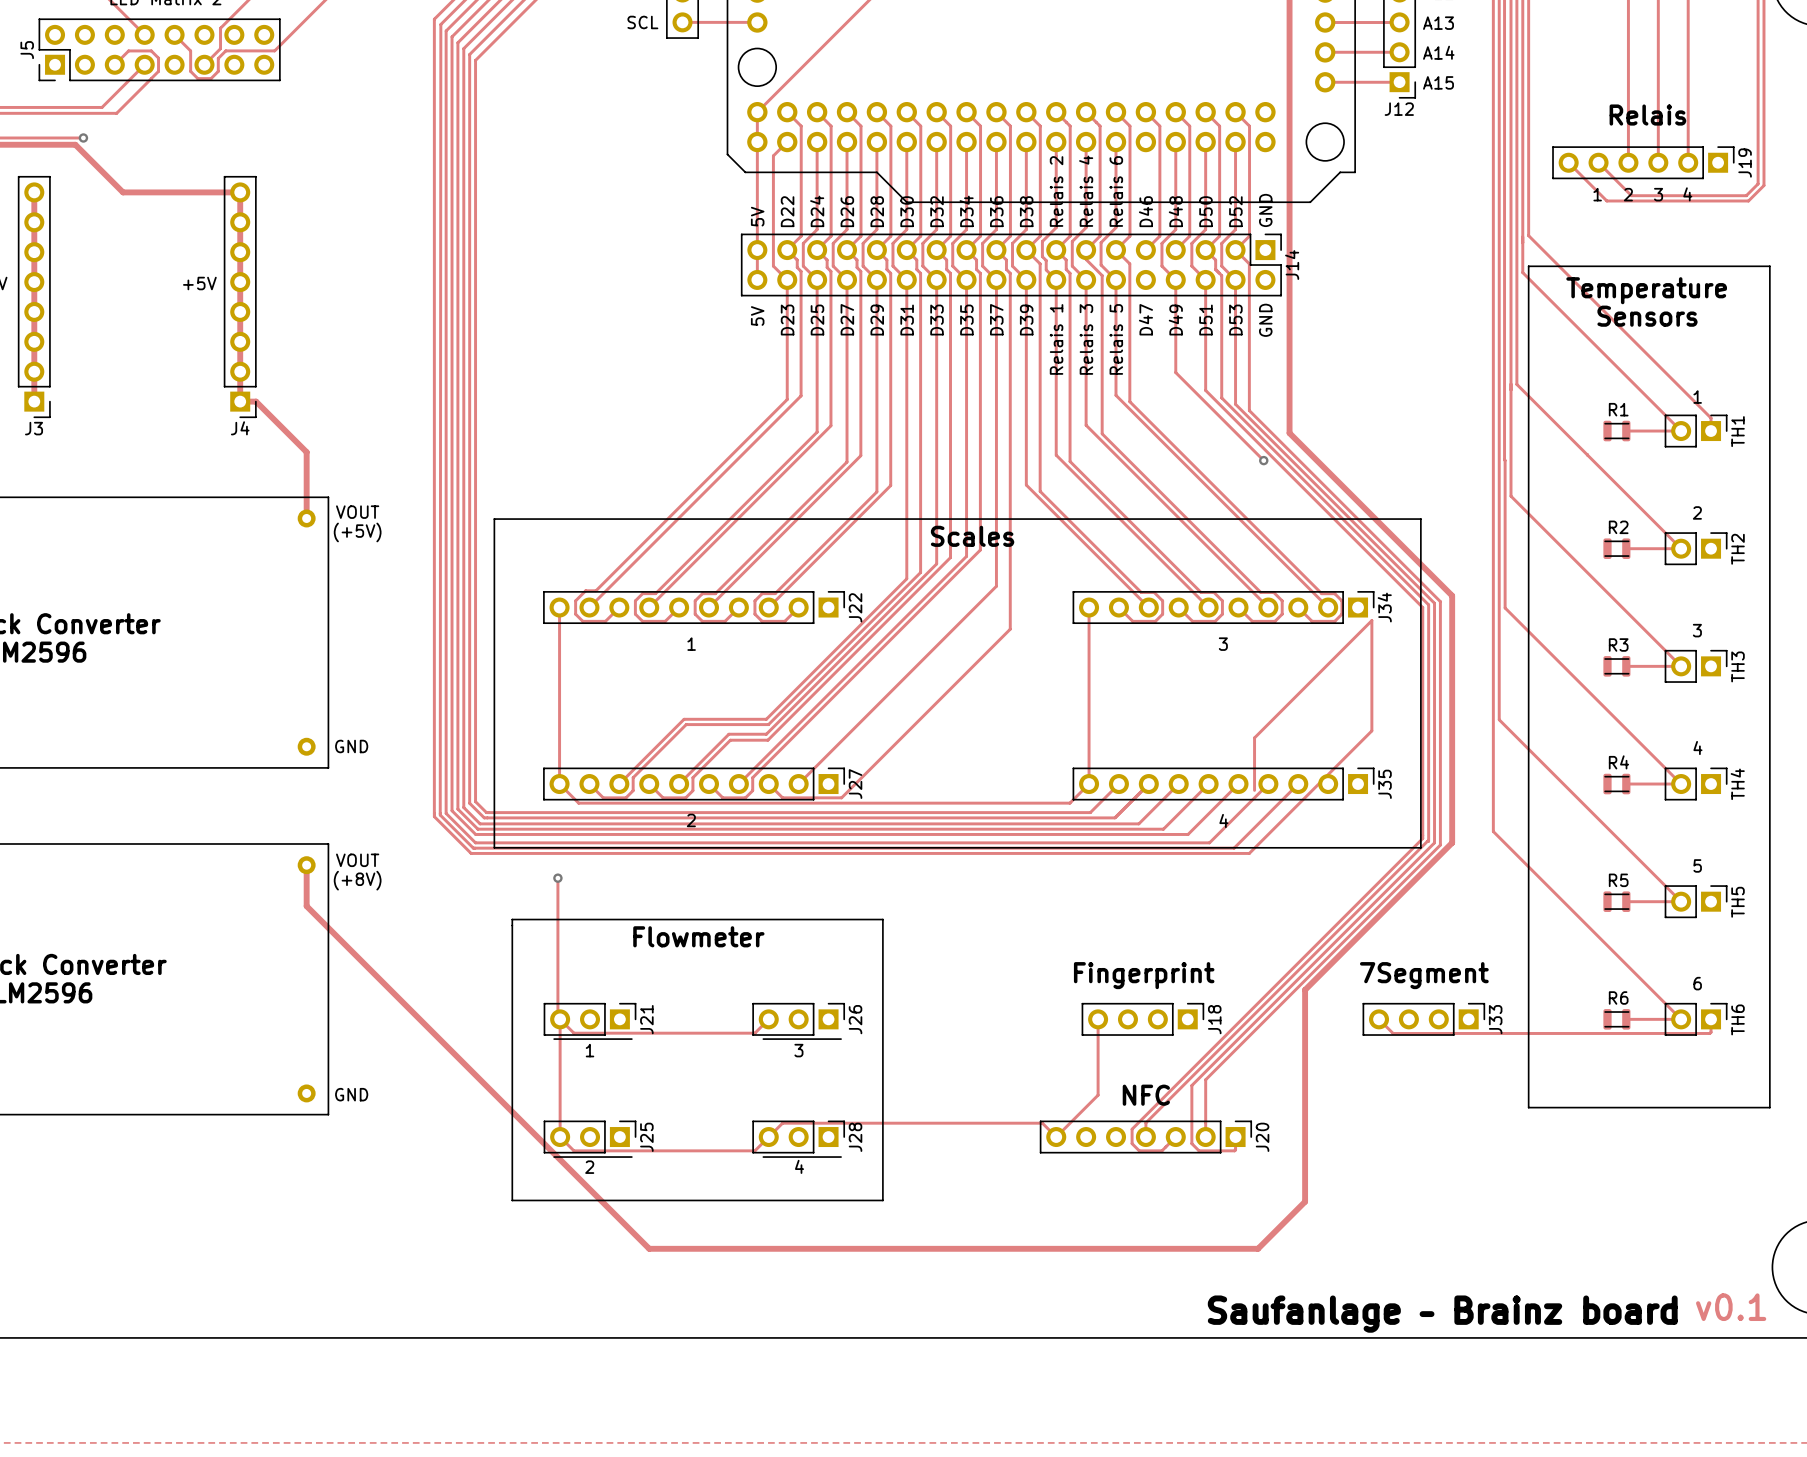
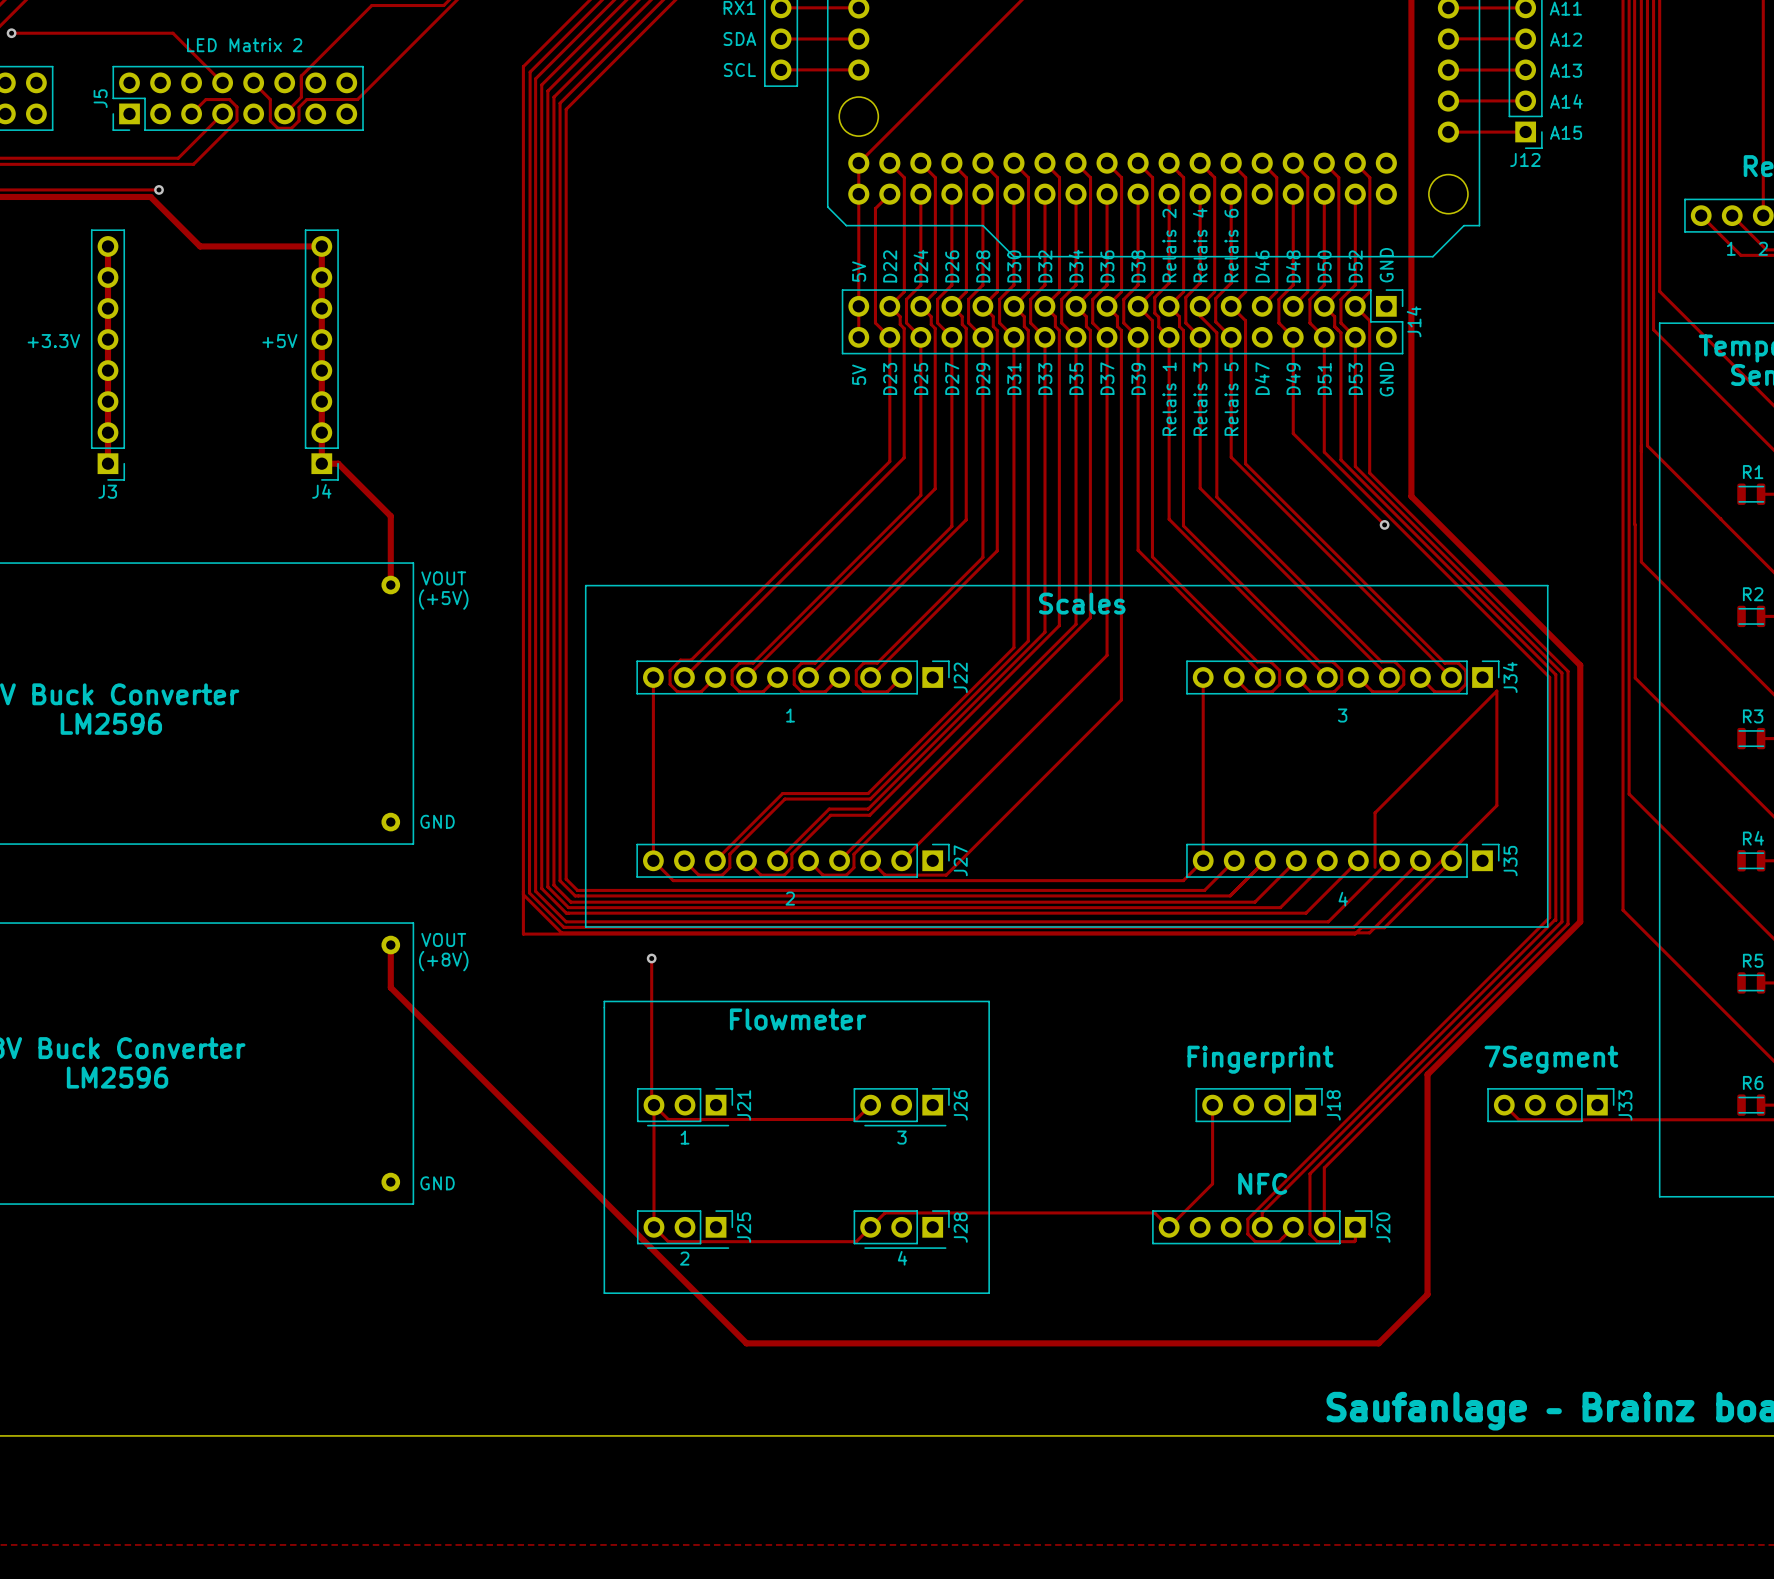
track: none -> (1451, 860) (1384, 927) (1361, 927) (1354, 934) (523, 934) (523, 894)

